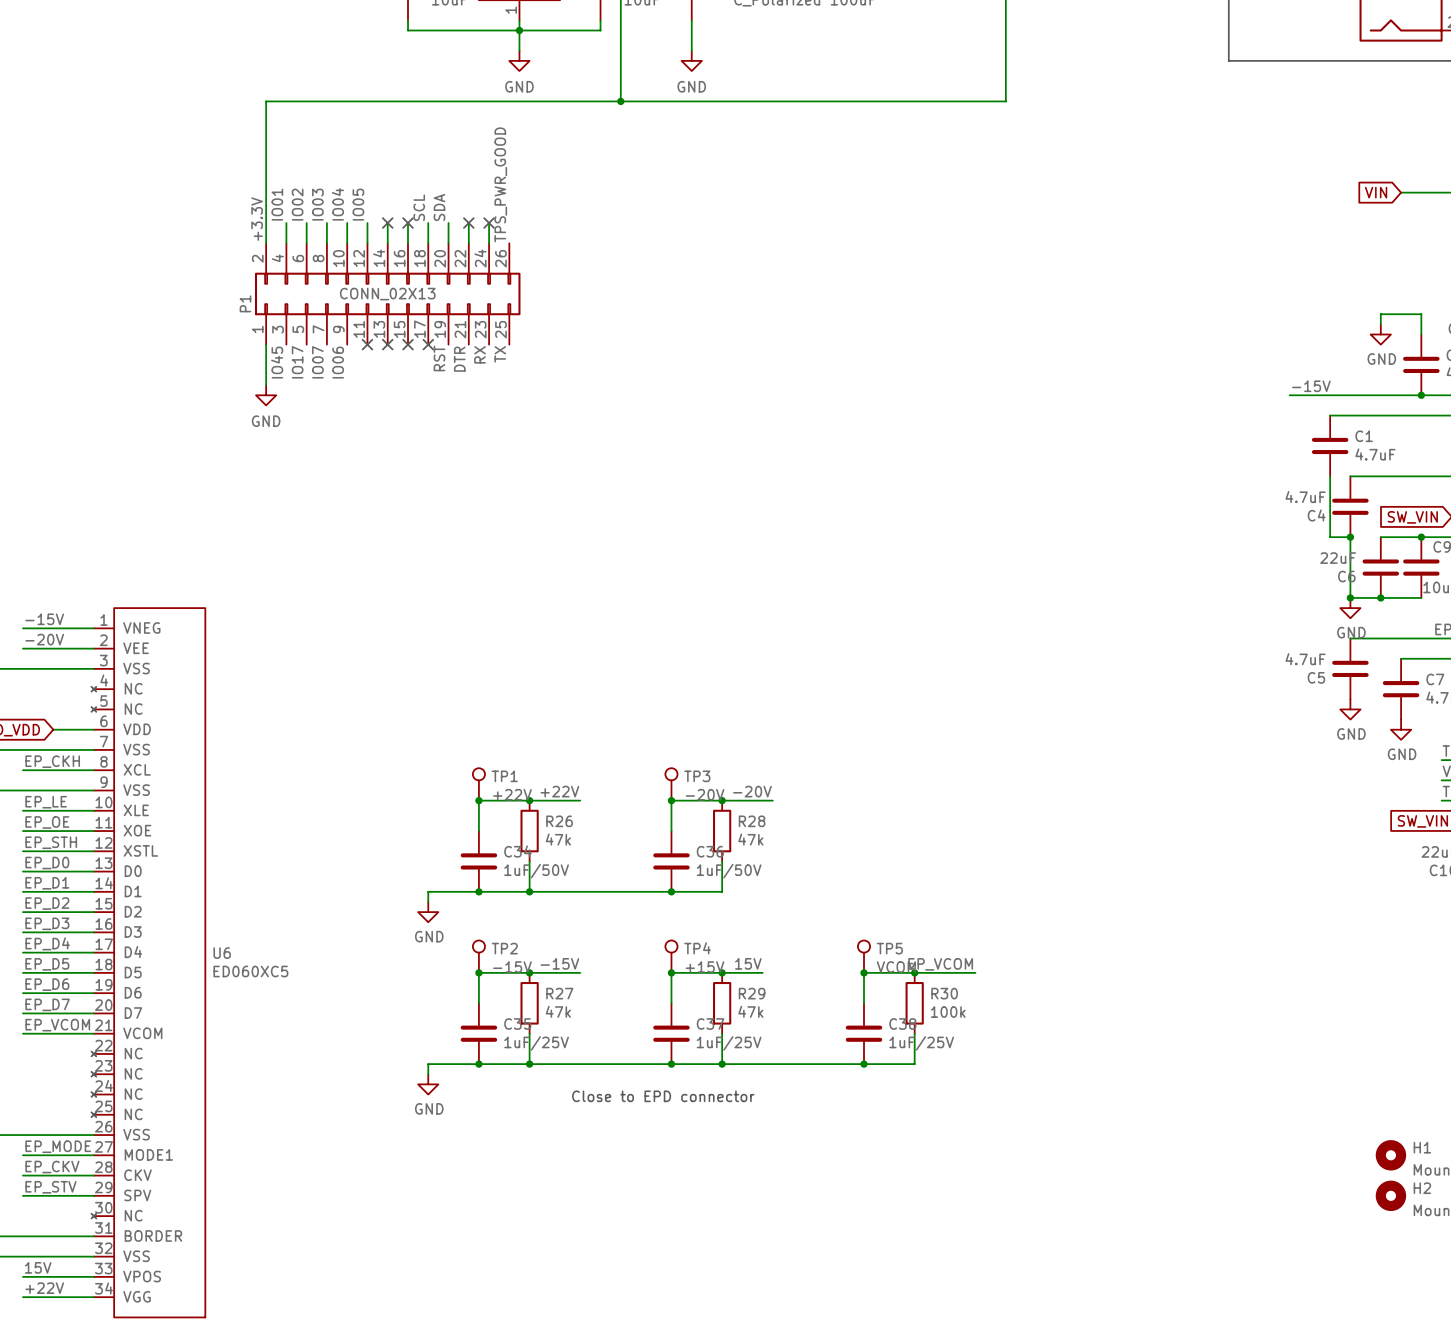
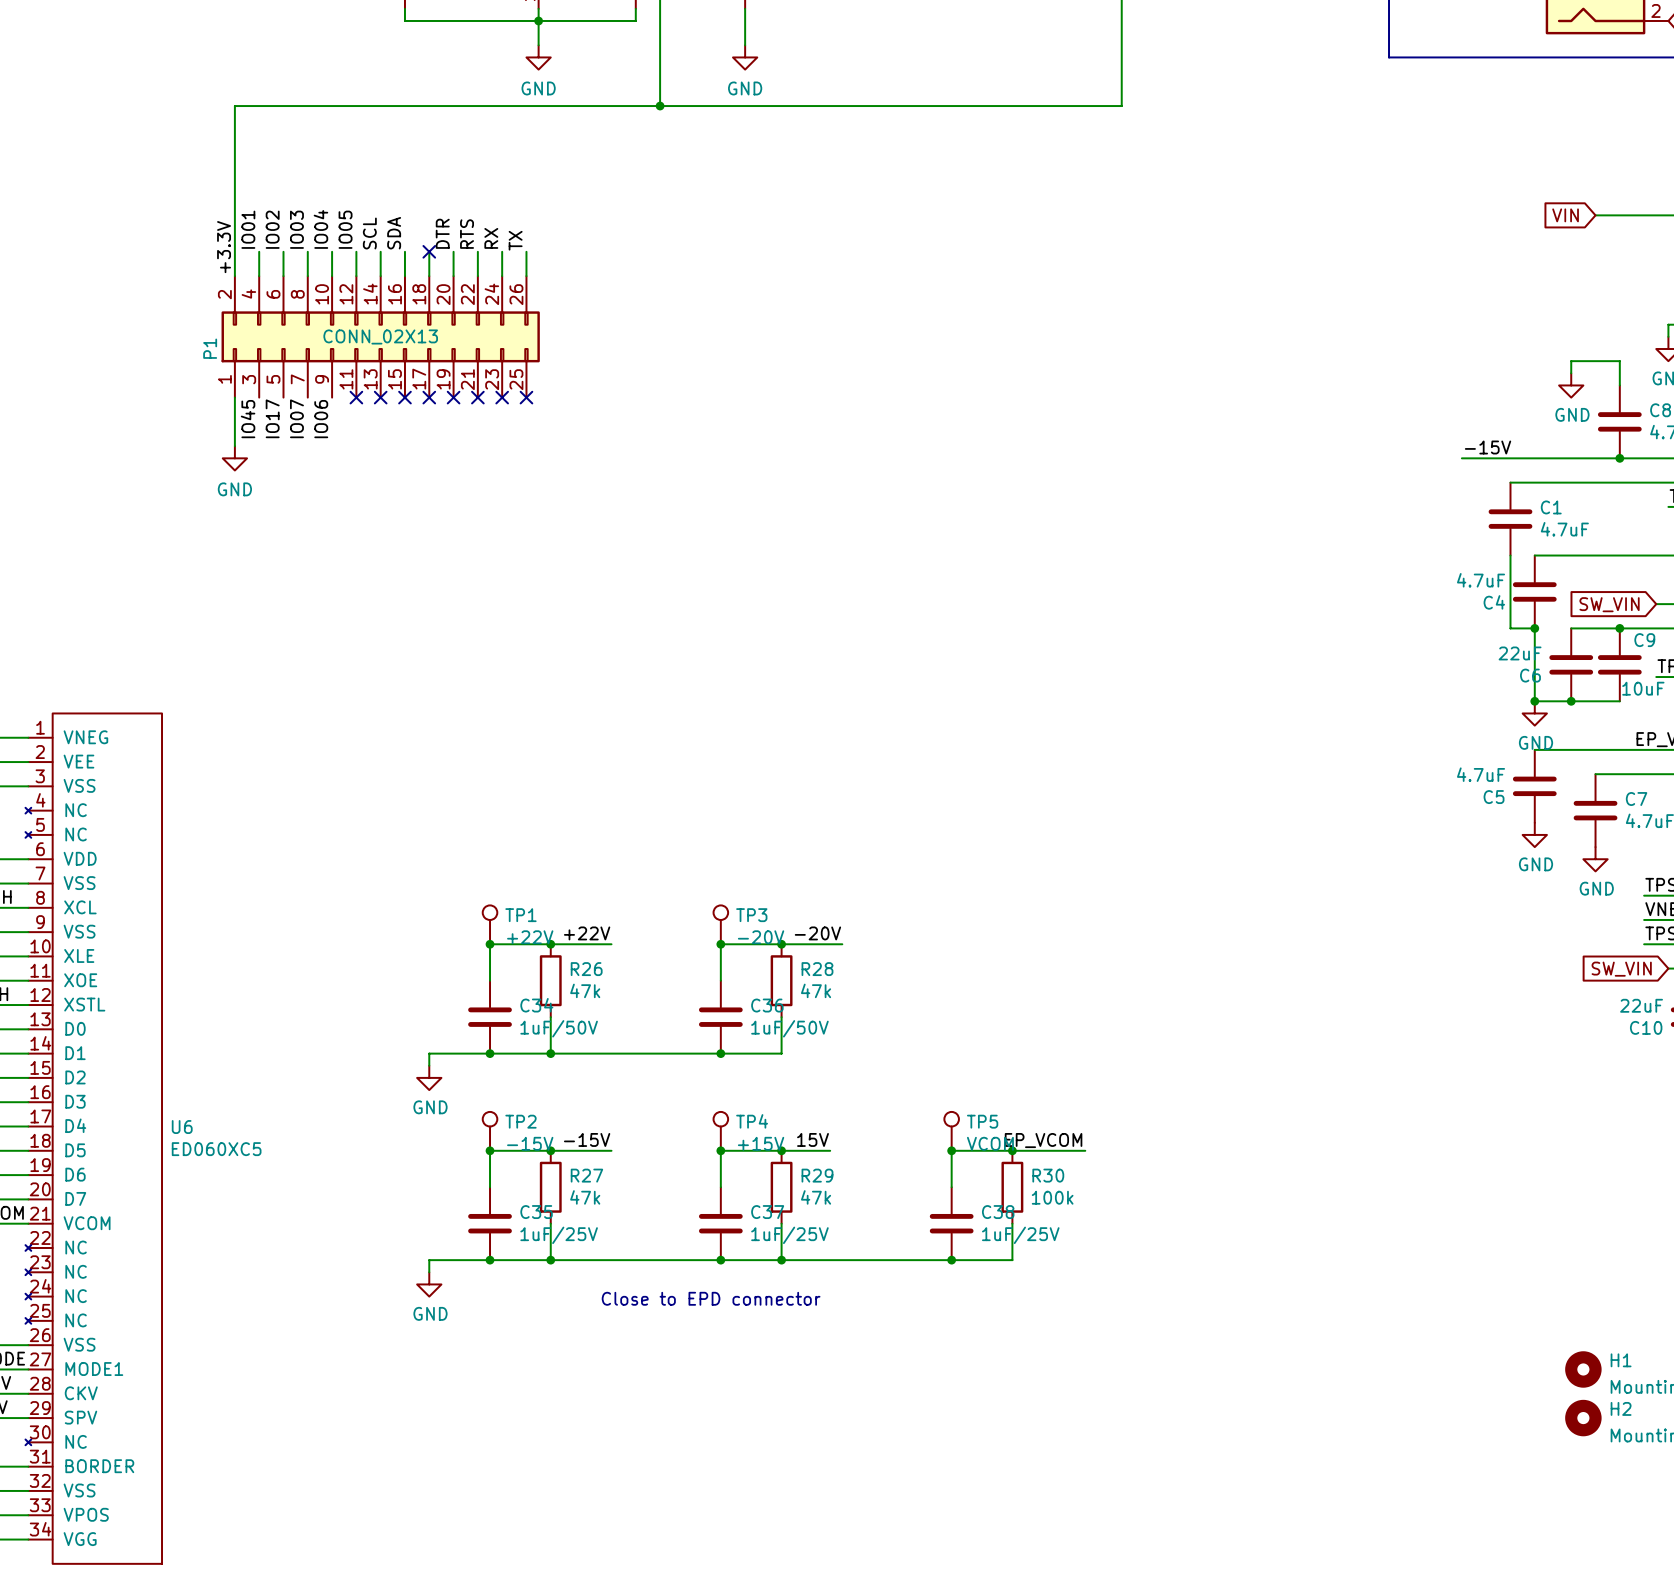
label: TPS_PWR_GOOD (500, 184) -> none
label: none -> SDA (394, 233)
label position: SCL (419, 207) -> SCL (369, 233)
label: SDA (439, 207) -> DTR (442, 233)
label: none -> RTS (467, 234)
no-connect mark: (387, 223) -> none
no-connect mark: (408, 223) -> none
no-connect mark: none -> (429, 251)
no-connect mark: (468, 223) -> none
no-connect mark: (489, 223) -> none
wire: none -> (526, 251) (526, 276)
no-connect mark: none -> (453, 397)
no-connect mark: none -> (477, 397)
no-connect mark: none -> (502, 397)
no-connect mark: none -> (526, 397)
label position: RX (480, 354) -> RX (491, 238)
label position: TX (500, 354) -> TX (515, 240)
label: RST (439, 358) -> none
label: DTR (459, 359) -> none

